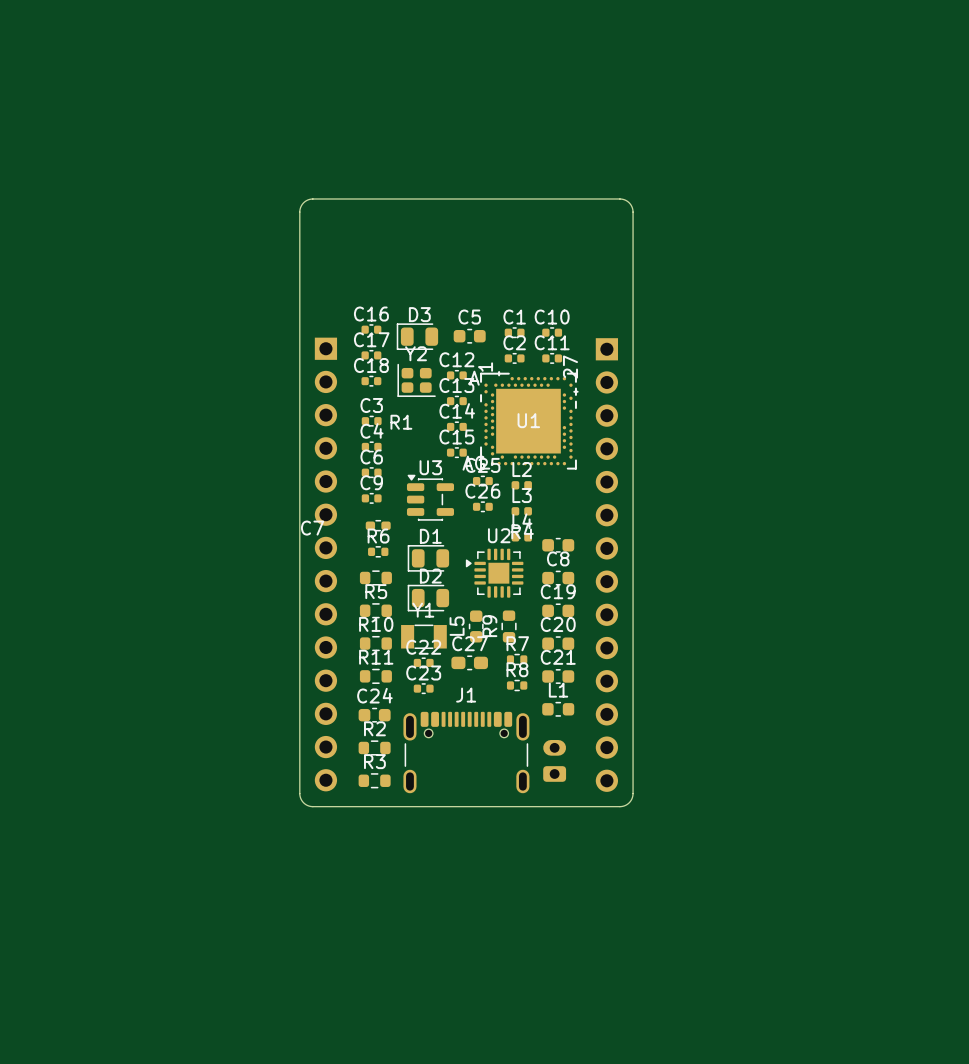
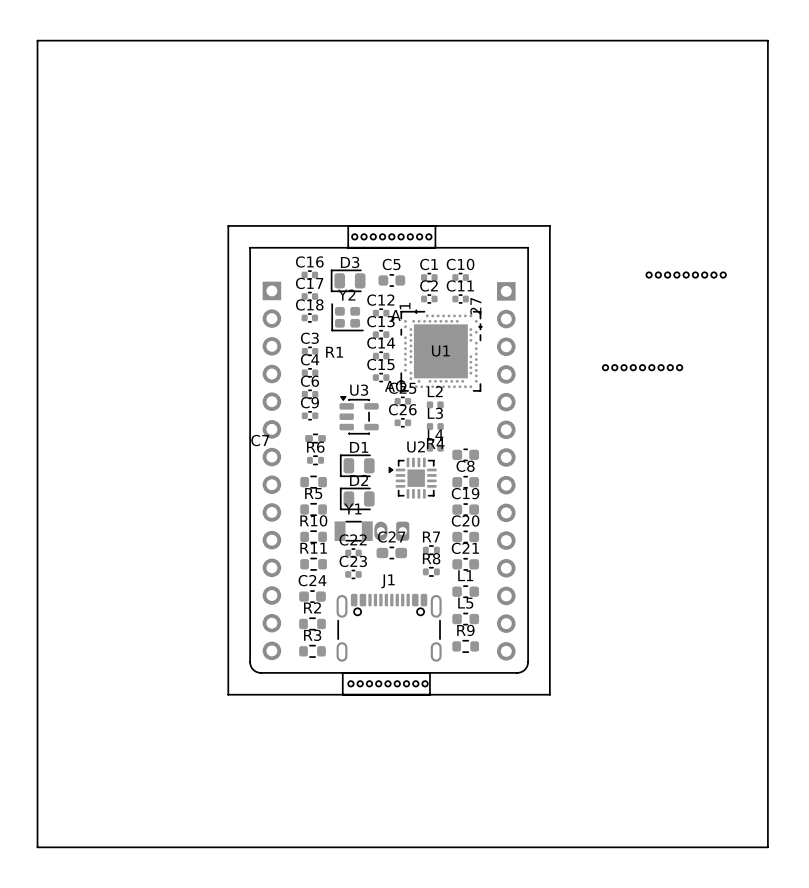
board edge: none -> (37, 40) (767, 40) (767, 847) (37, 847) (37, 40)
board edge: none -> (228, 225) (549, 225) (549, 694) (228, 694) (228, 225)
board edge: none -> (348, 225) (348, 247) (435, 247) (435, 225)
part: none -> (391, 236)
board edge: (299, 297) (299, 210) (303, 202) (312, 198) (624, 199) (630, 203) (632, 210) (633, 297) -> (250, 247) (528, 247)
part: none -> (686, 275)
part: none -> (642, 367)
L5 rotation: 0° (476, 626) -> 90° clockwise (465, 619)
L5 position: (476, 626) -> (465, 619)
R9 rotation: 0° (509, 626) -> 90° clockwise (465, 646)
R9 position: (509, 626) -> (465, 646)
part rotation: 0° (554, 760) -> 90° counterclockwise (391, 531)
part position: (554, 760) -> (391, 531)
part: none -> (388, 683)
board edge: none -> (342, 694) (342, 672) (429, 672) (429, 694)

